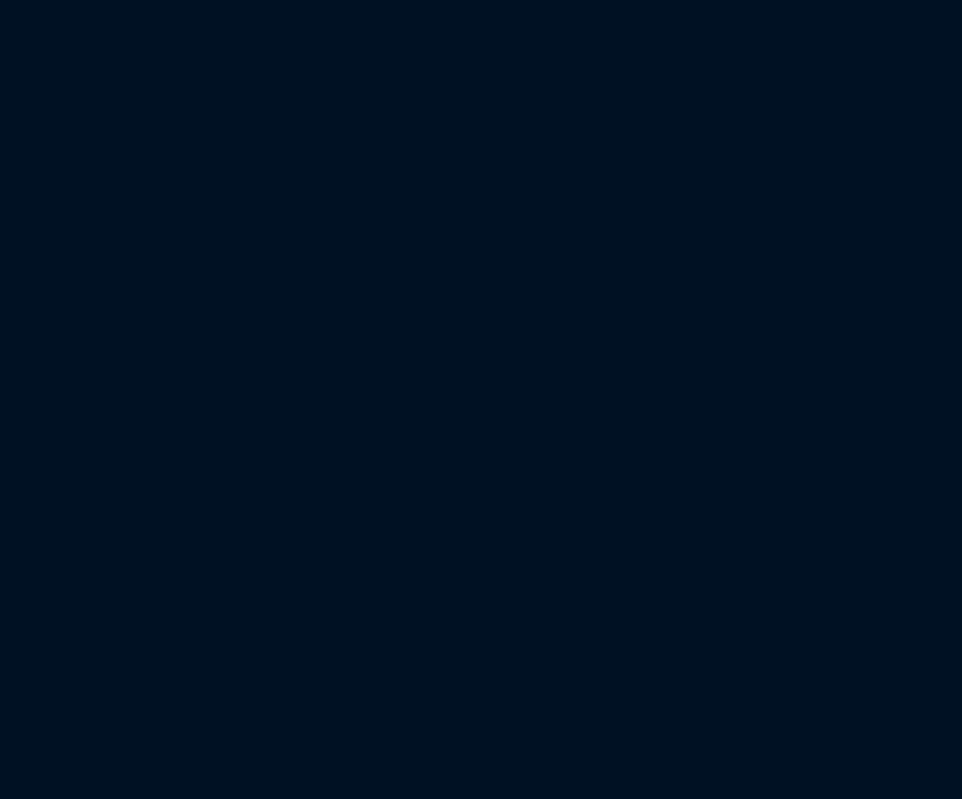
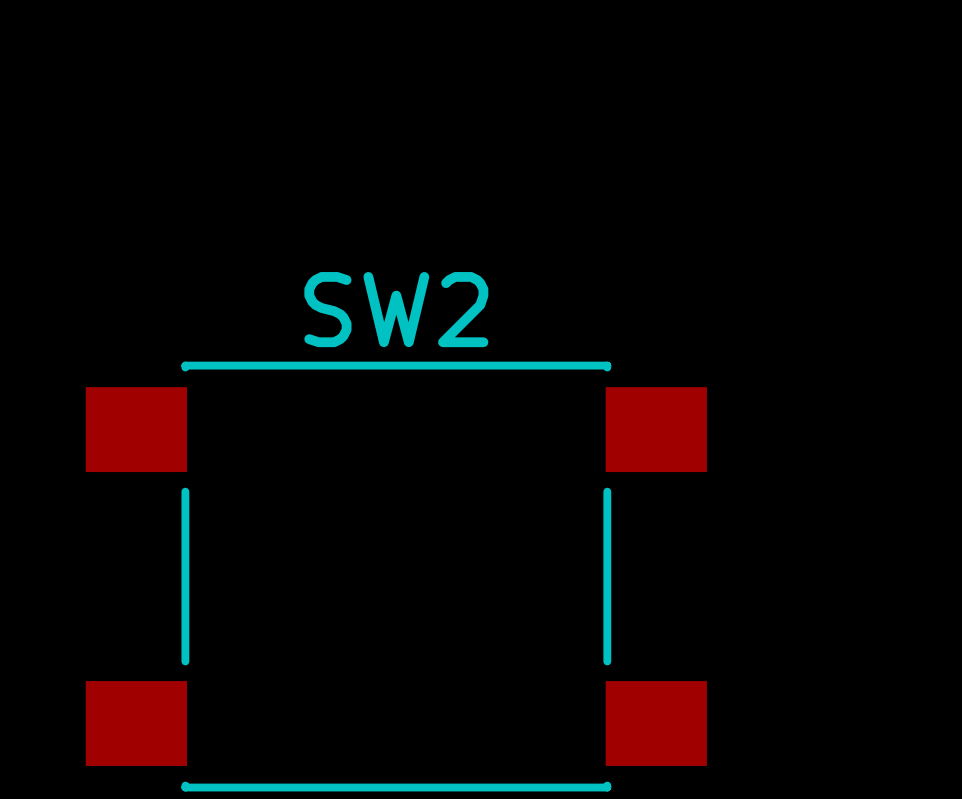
SW2: none -> (396, 576)

